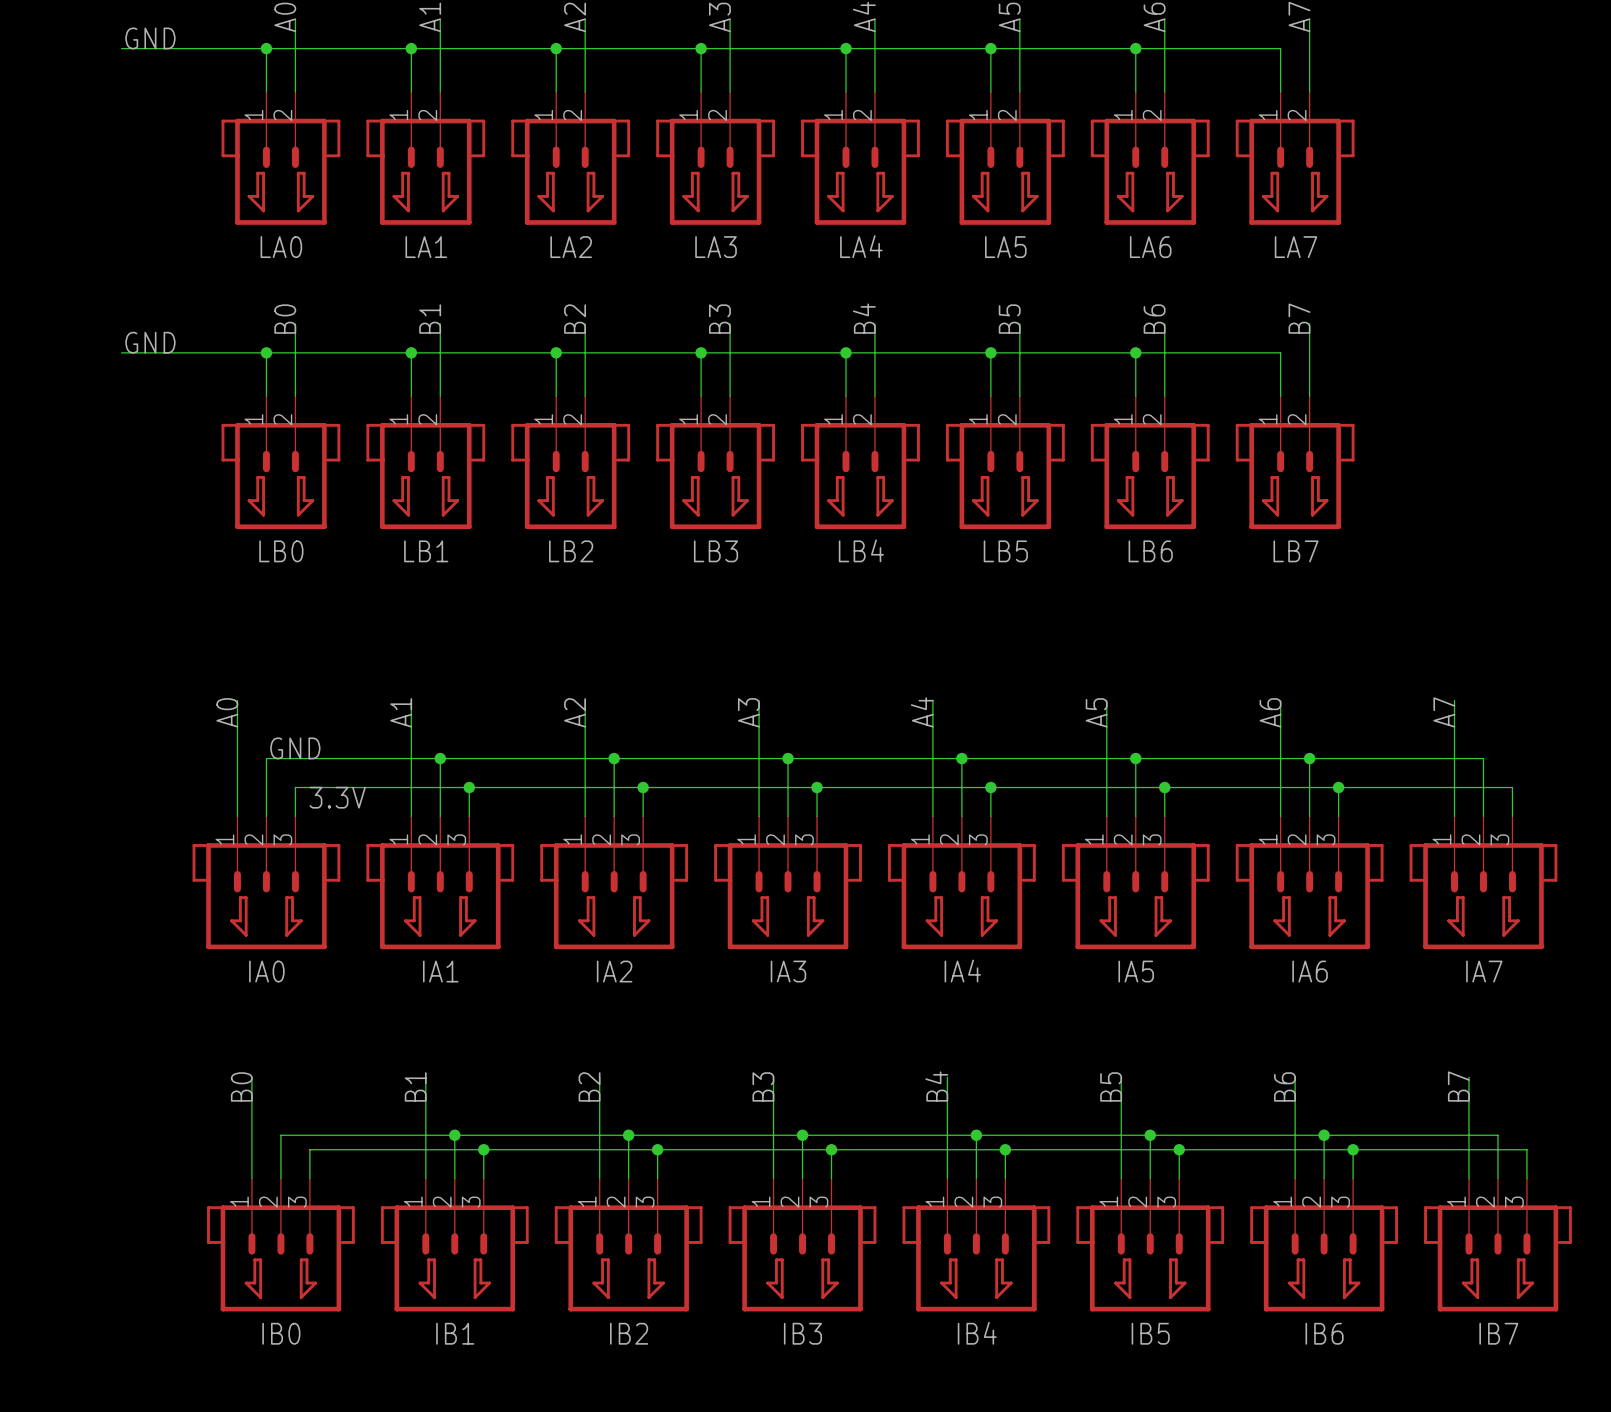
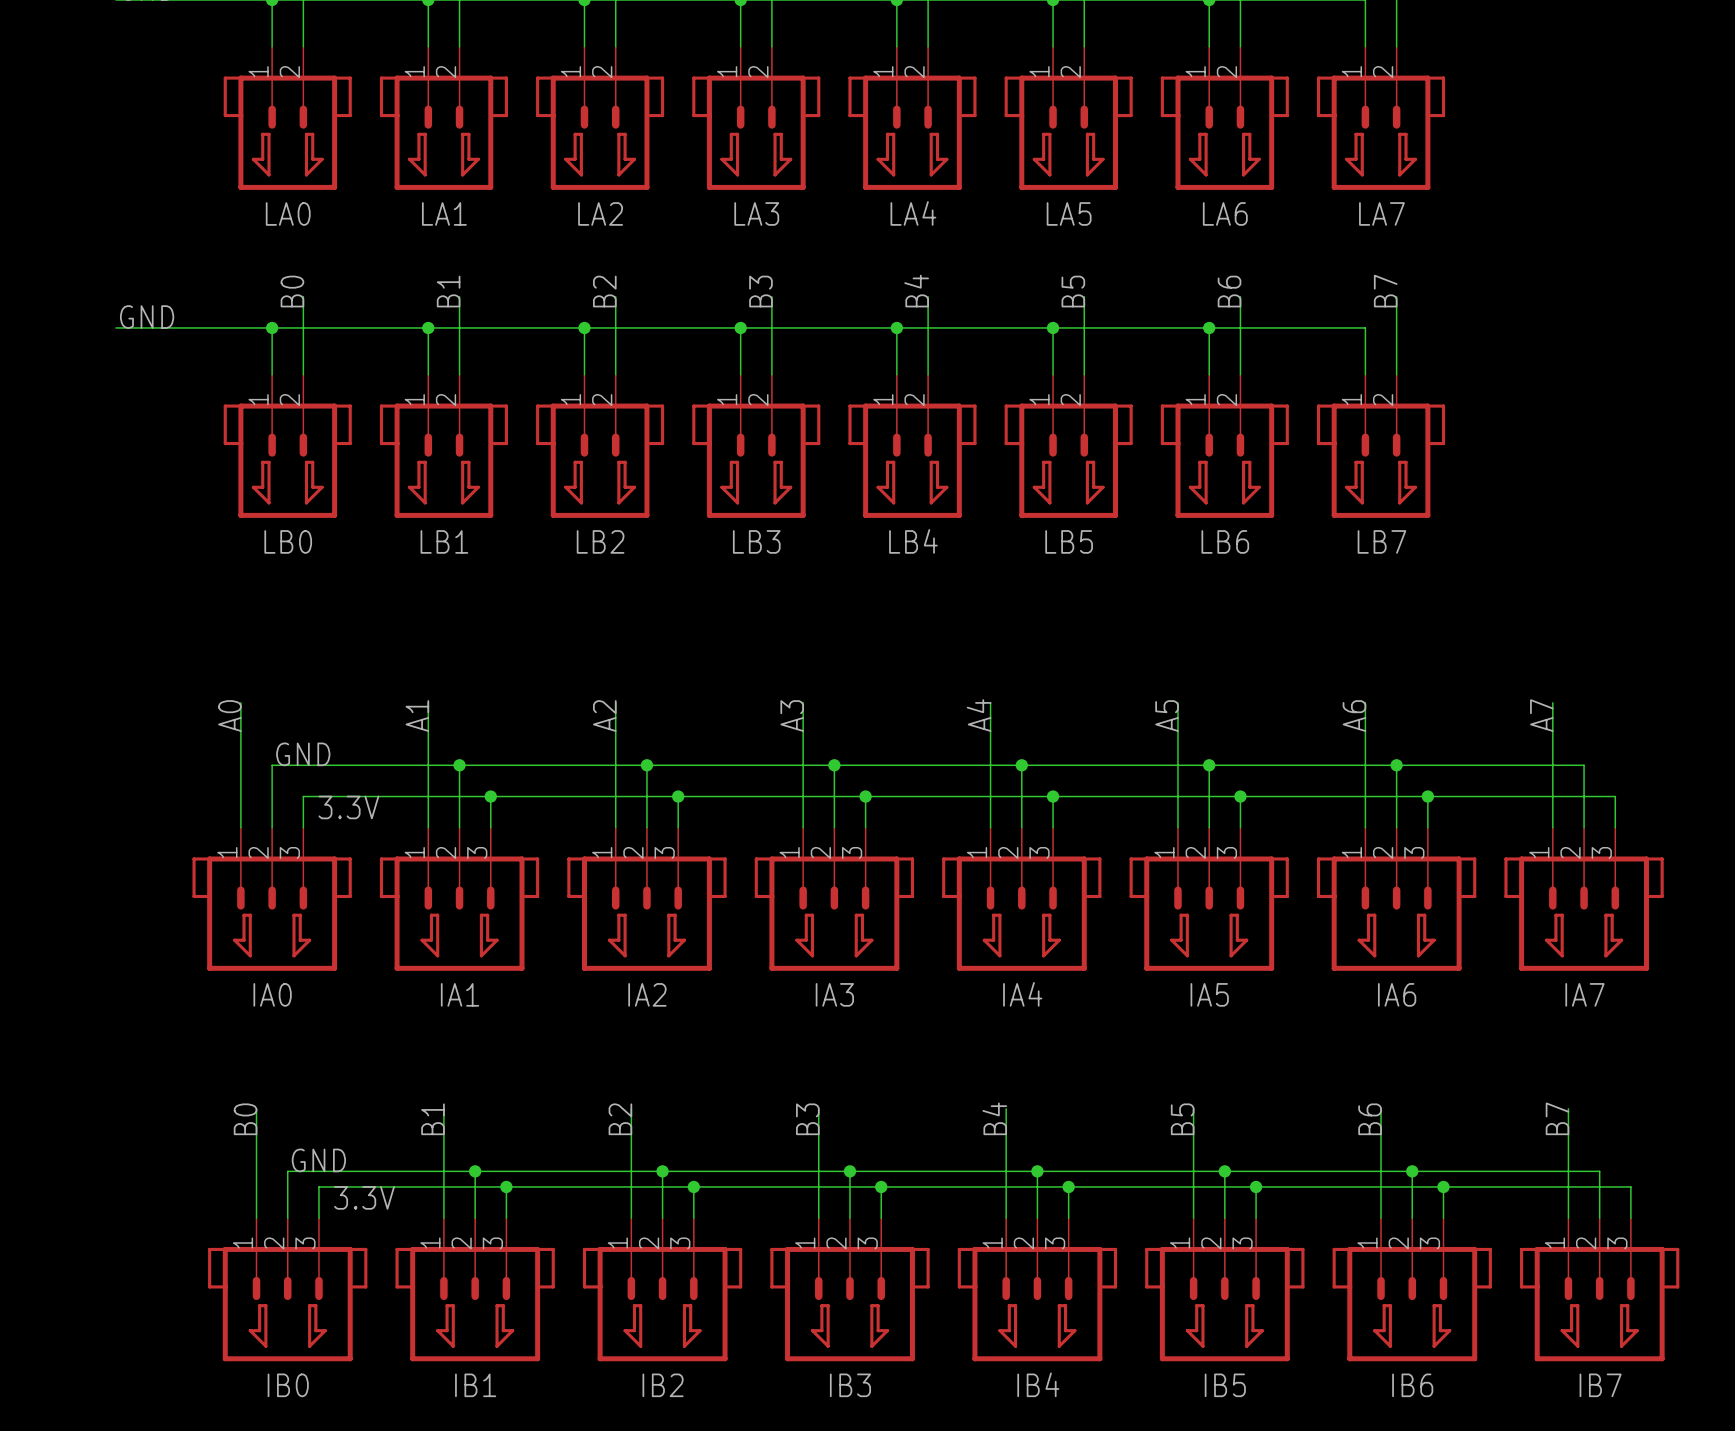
label: none -> GND (318, 1160)
label: none -> 3.3V (364, 1197)

